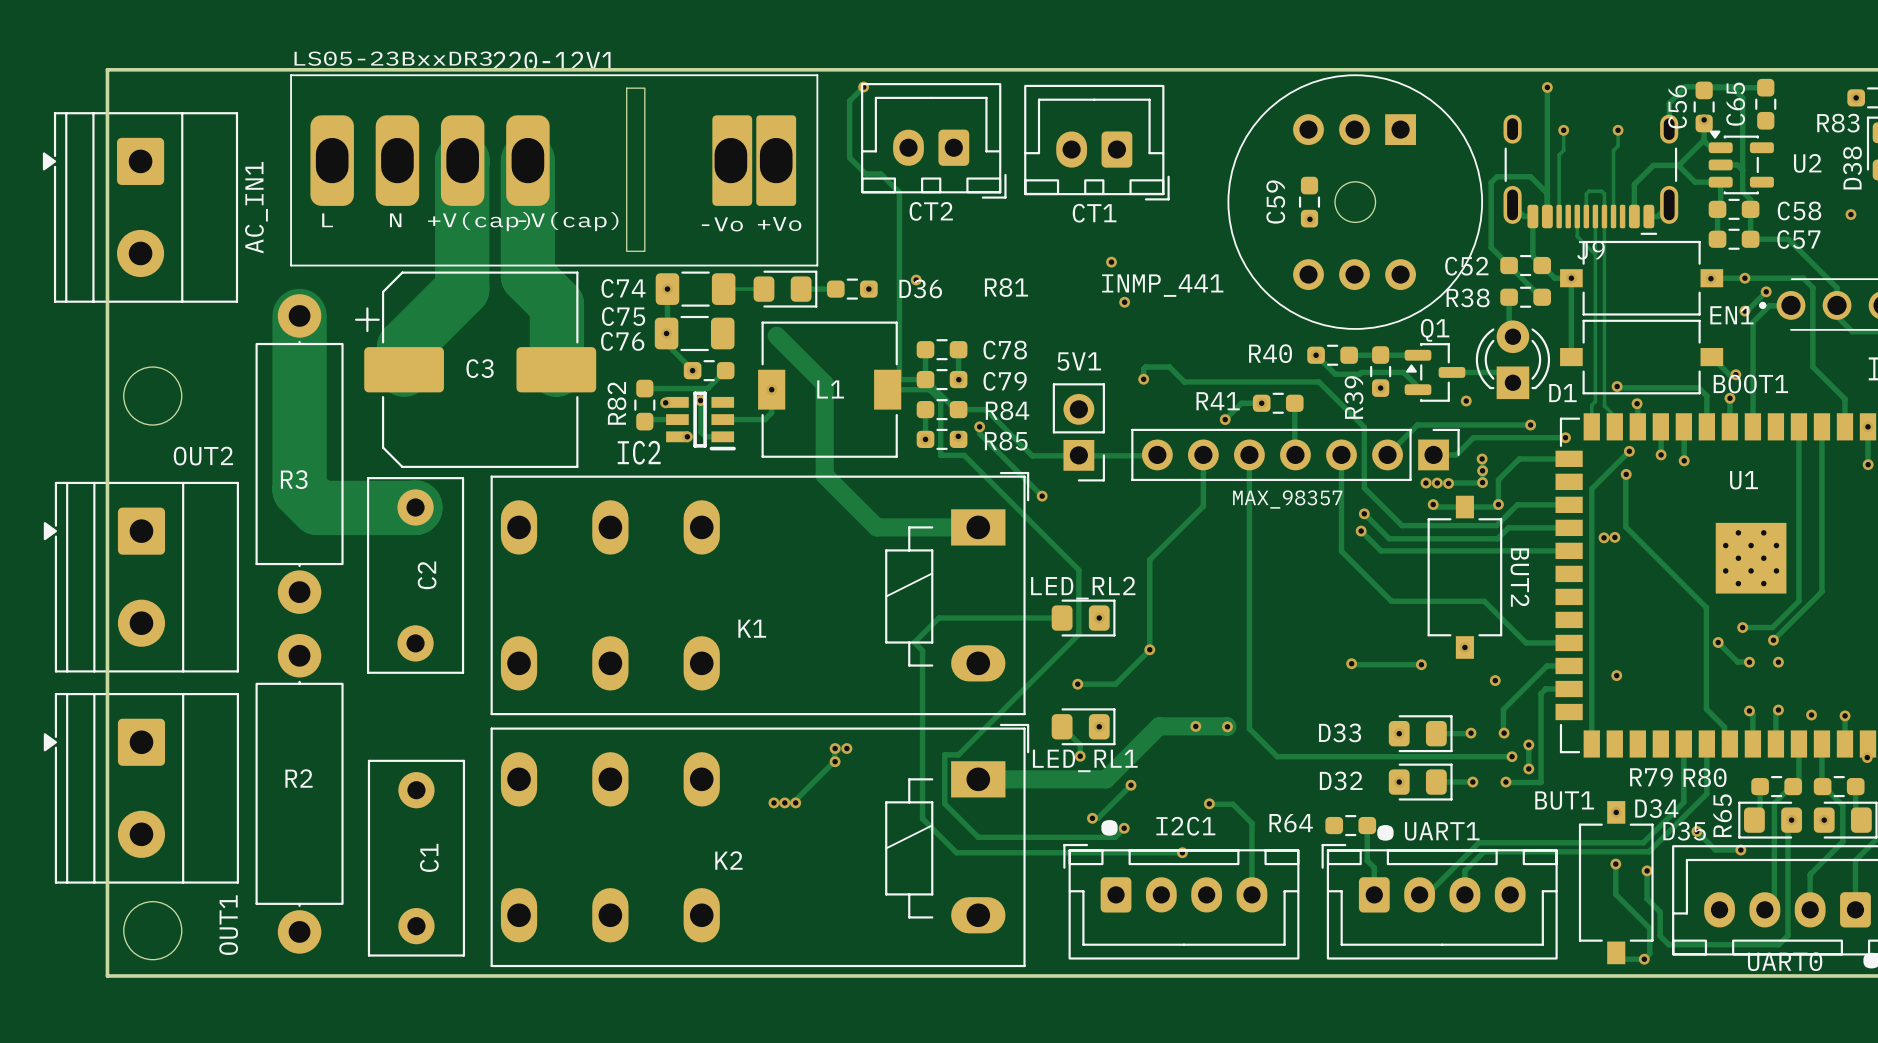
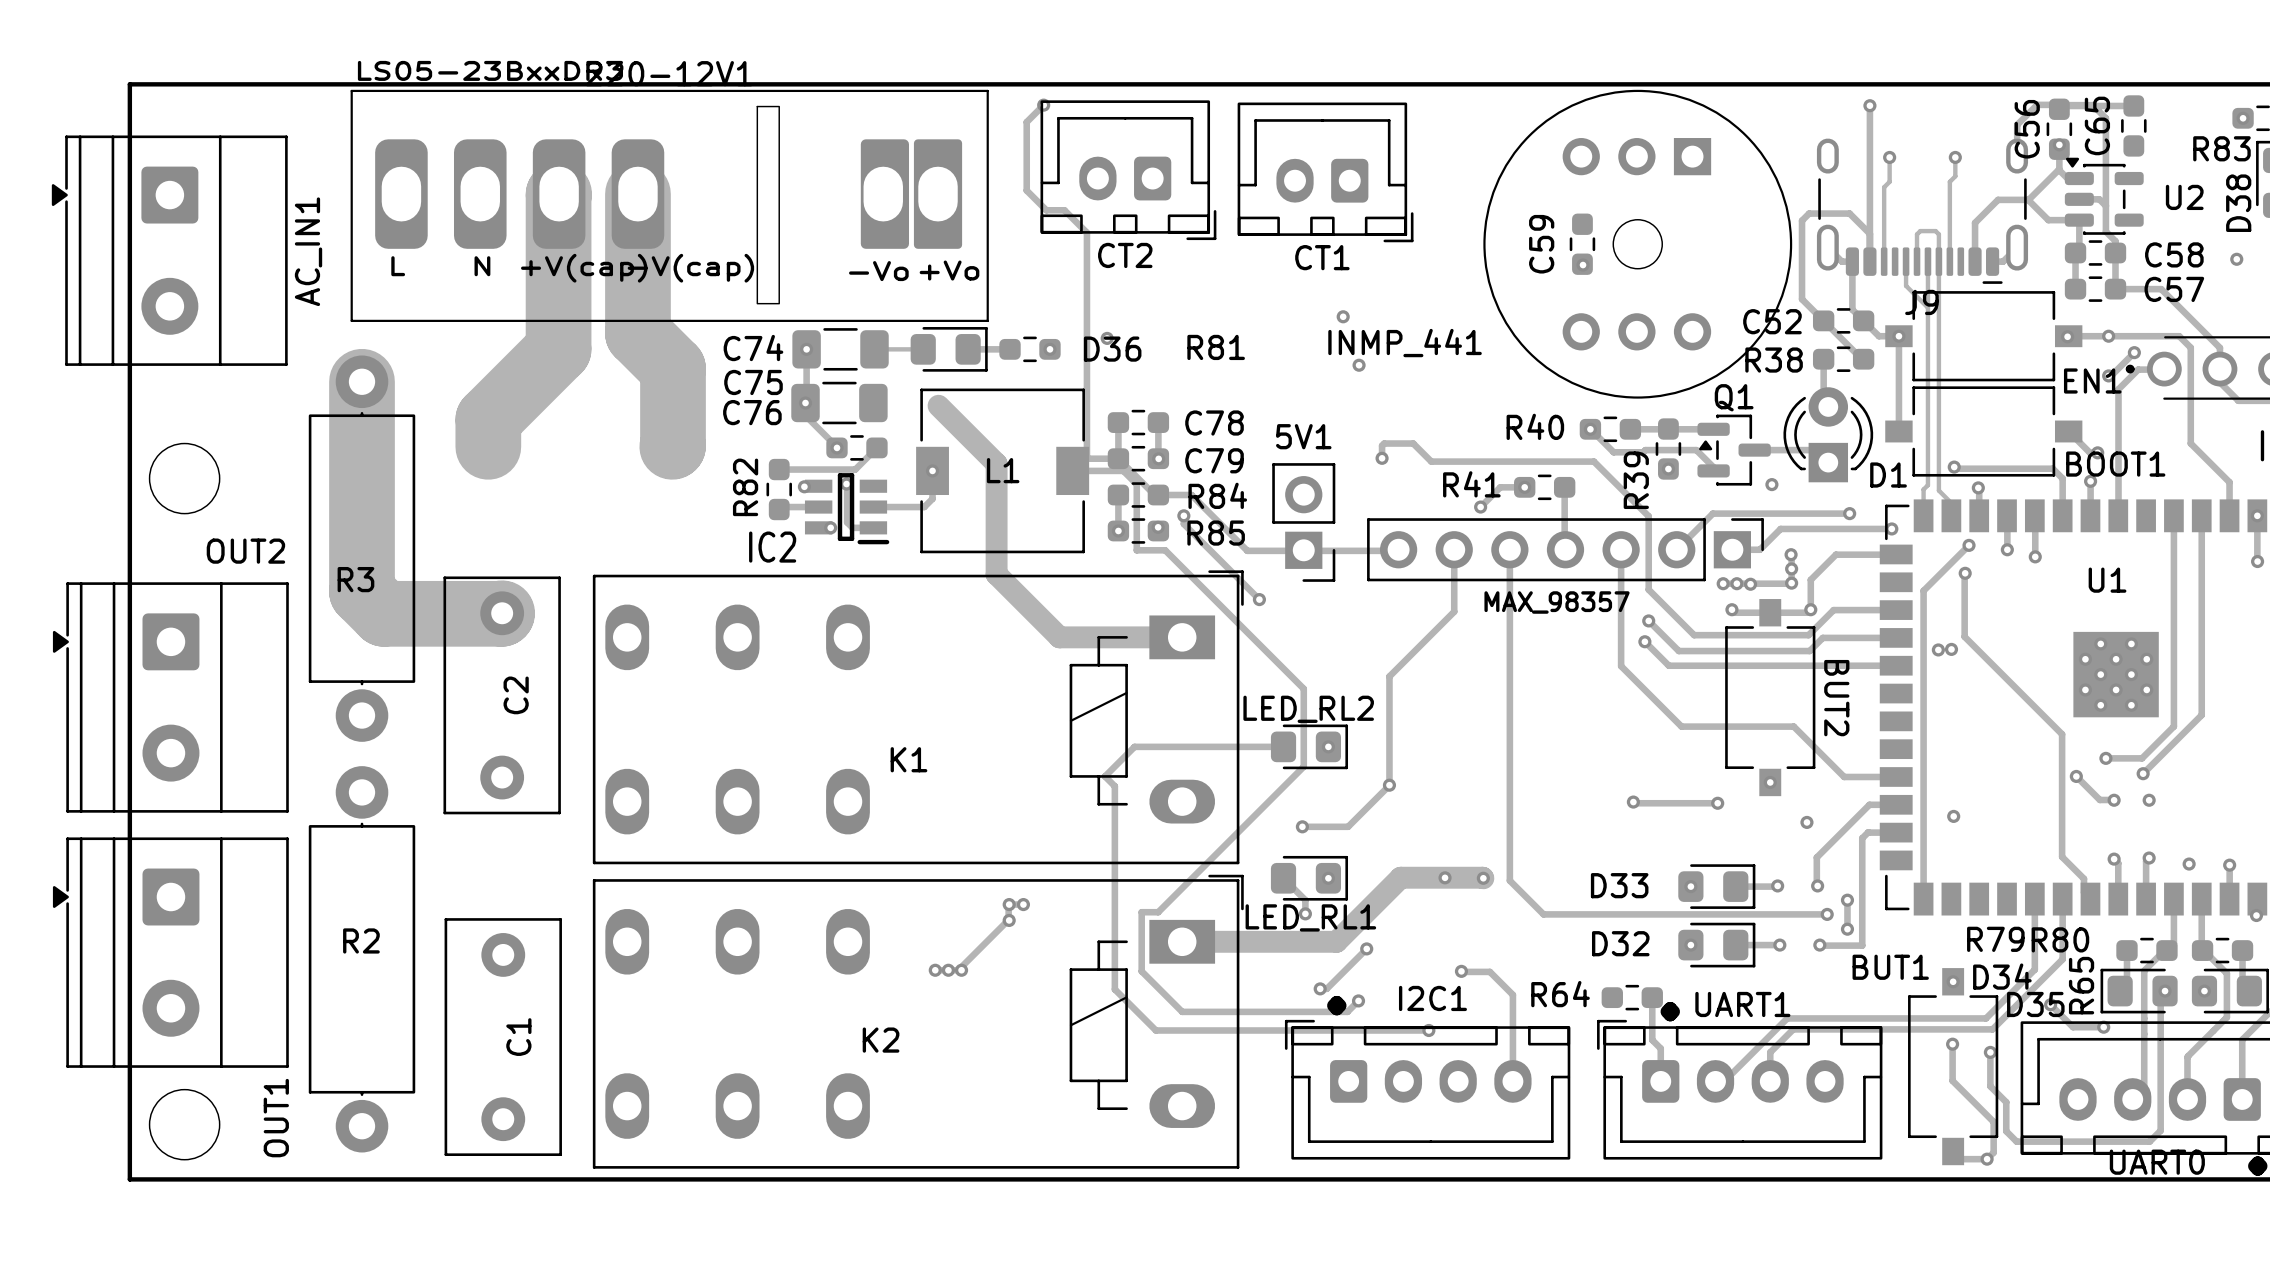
C3: (475, 369) -> none

